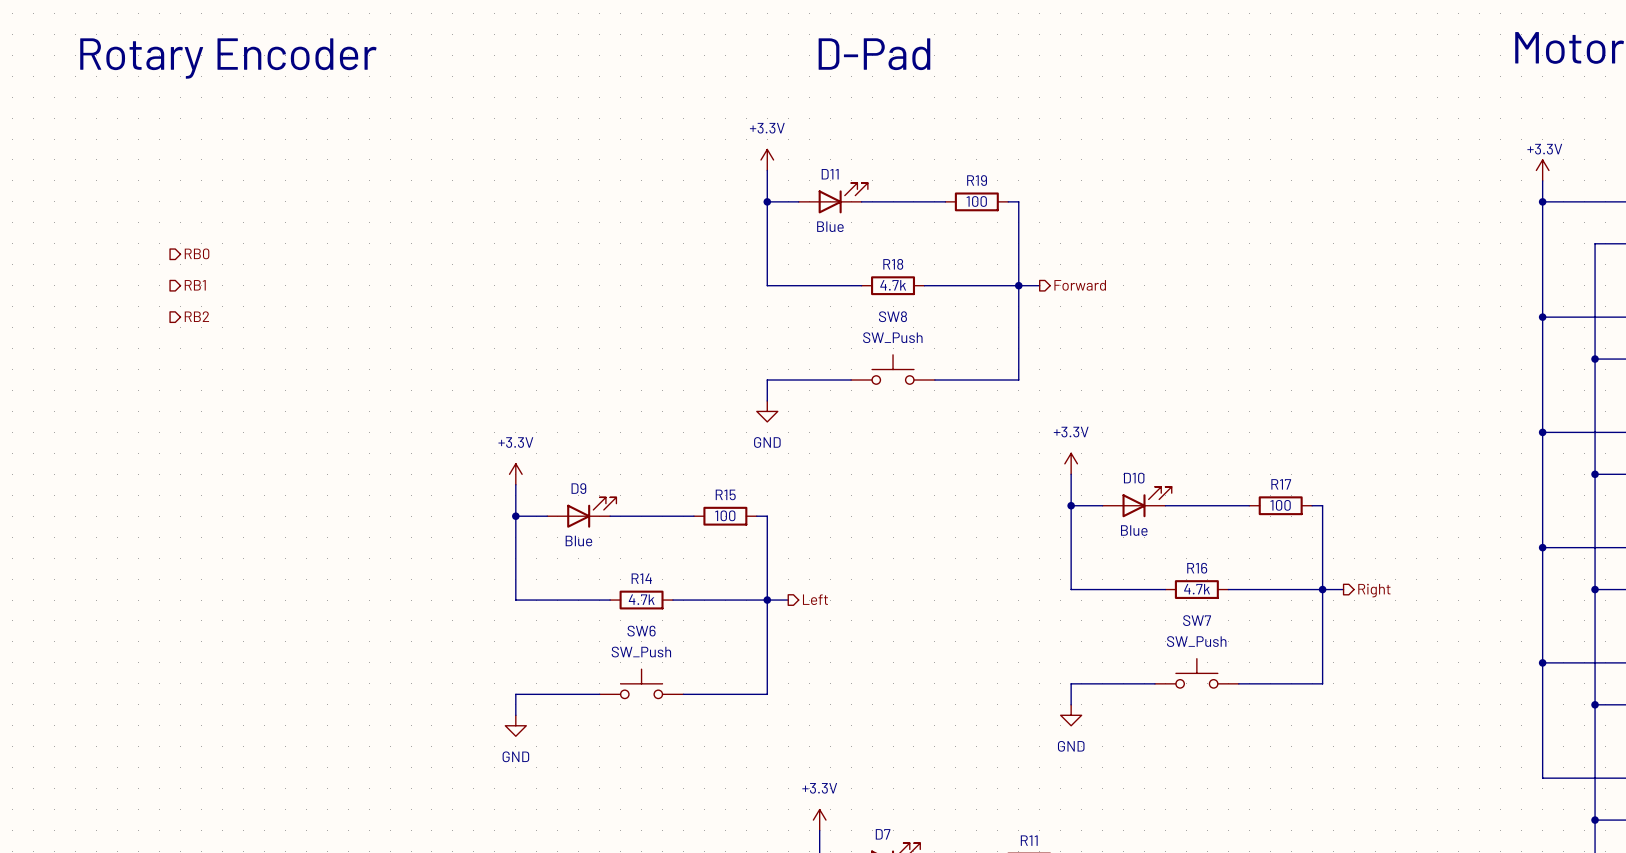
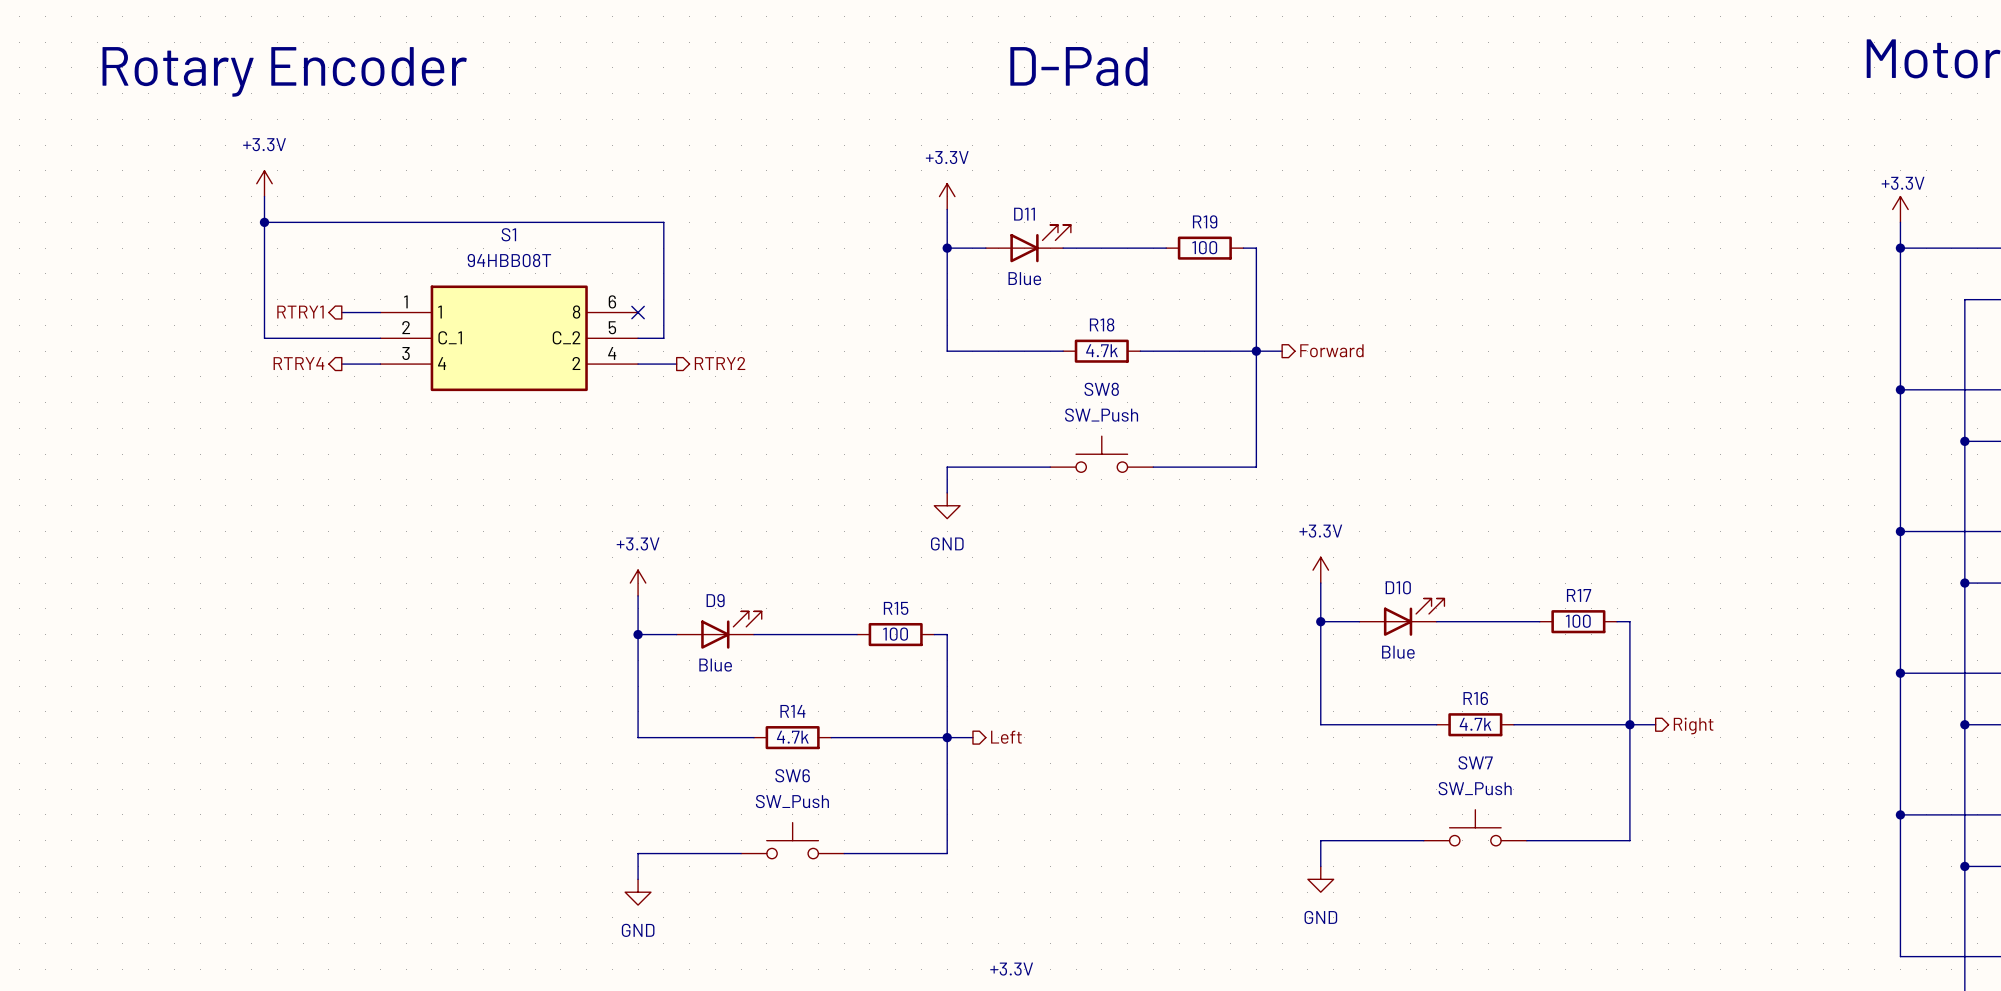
power symbol: none -> +3.3V (264, 183)
wire: none -> (264, 196) (264, 338) (380, 338)
wire: none -> (264, 222) (663, 222) (663, 338) (638, 338)
junction: none -> (264, 222)
hierarchical label: RB0 (197, 253) -> none
hierarchical label: none -> RTRY1 (300, 312)
wire: none -> (341, 312) (380, 312)
no-connect mark: none -> (638, 312)
S1: none -> 94HBB08T (509, 338)
hierarchical label: RB1 (195, 285) -> none
hierarchical label: none -> RTRY4 (298, 363)
hierarchical label: none -> RTRY2 (720, 363)
wire: none -> (341, 364) (380, 364)
wire: none -> (638, 364) (676, 364)
hierarchical label: RB2 (196, 316) -> none

